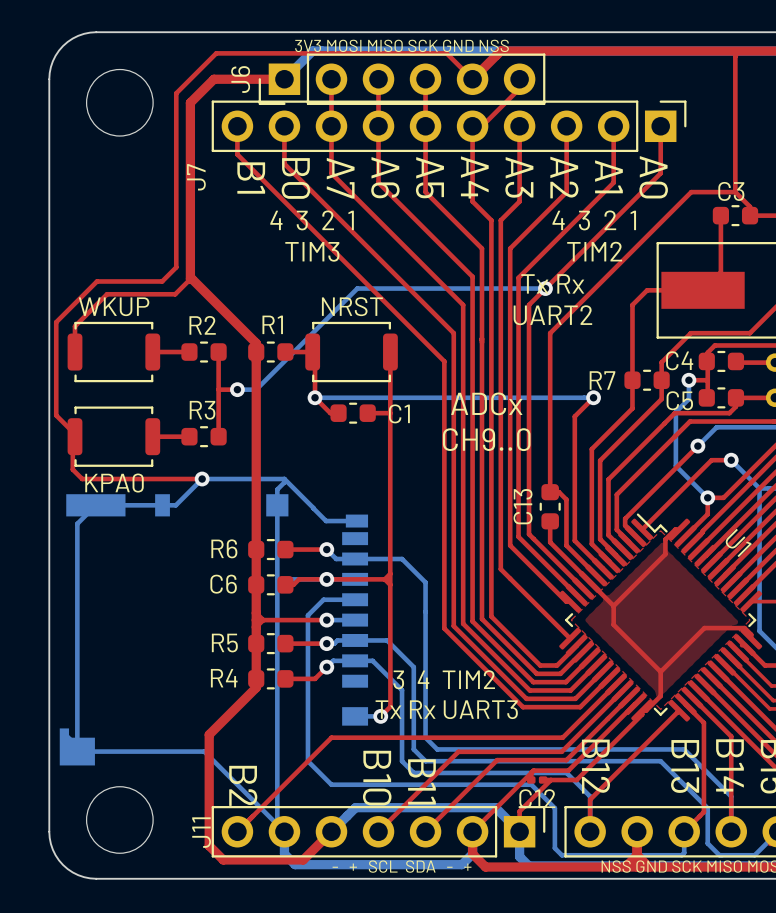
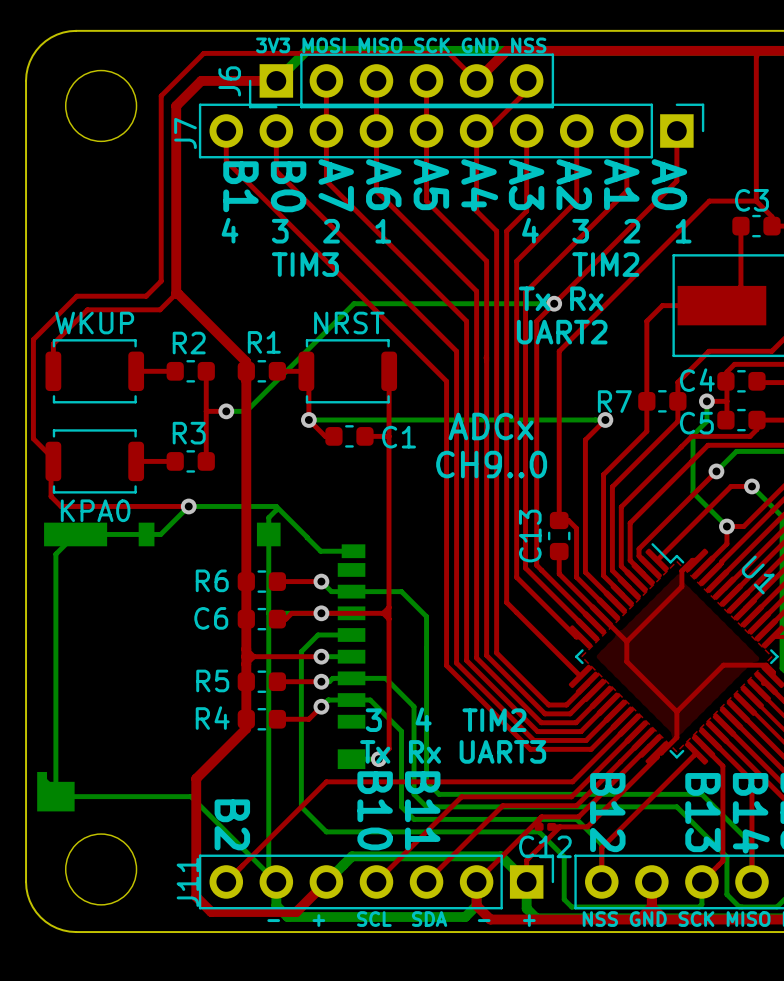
J7 name position: J7 (196, 177) -> J7 (185, 133)

